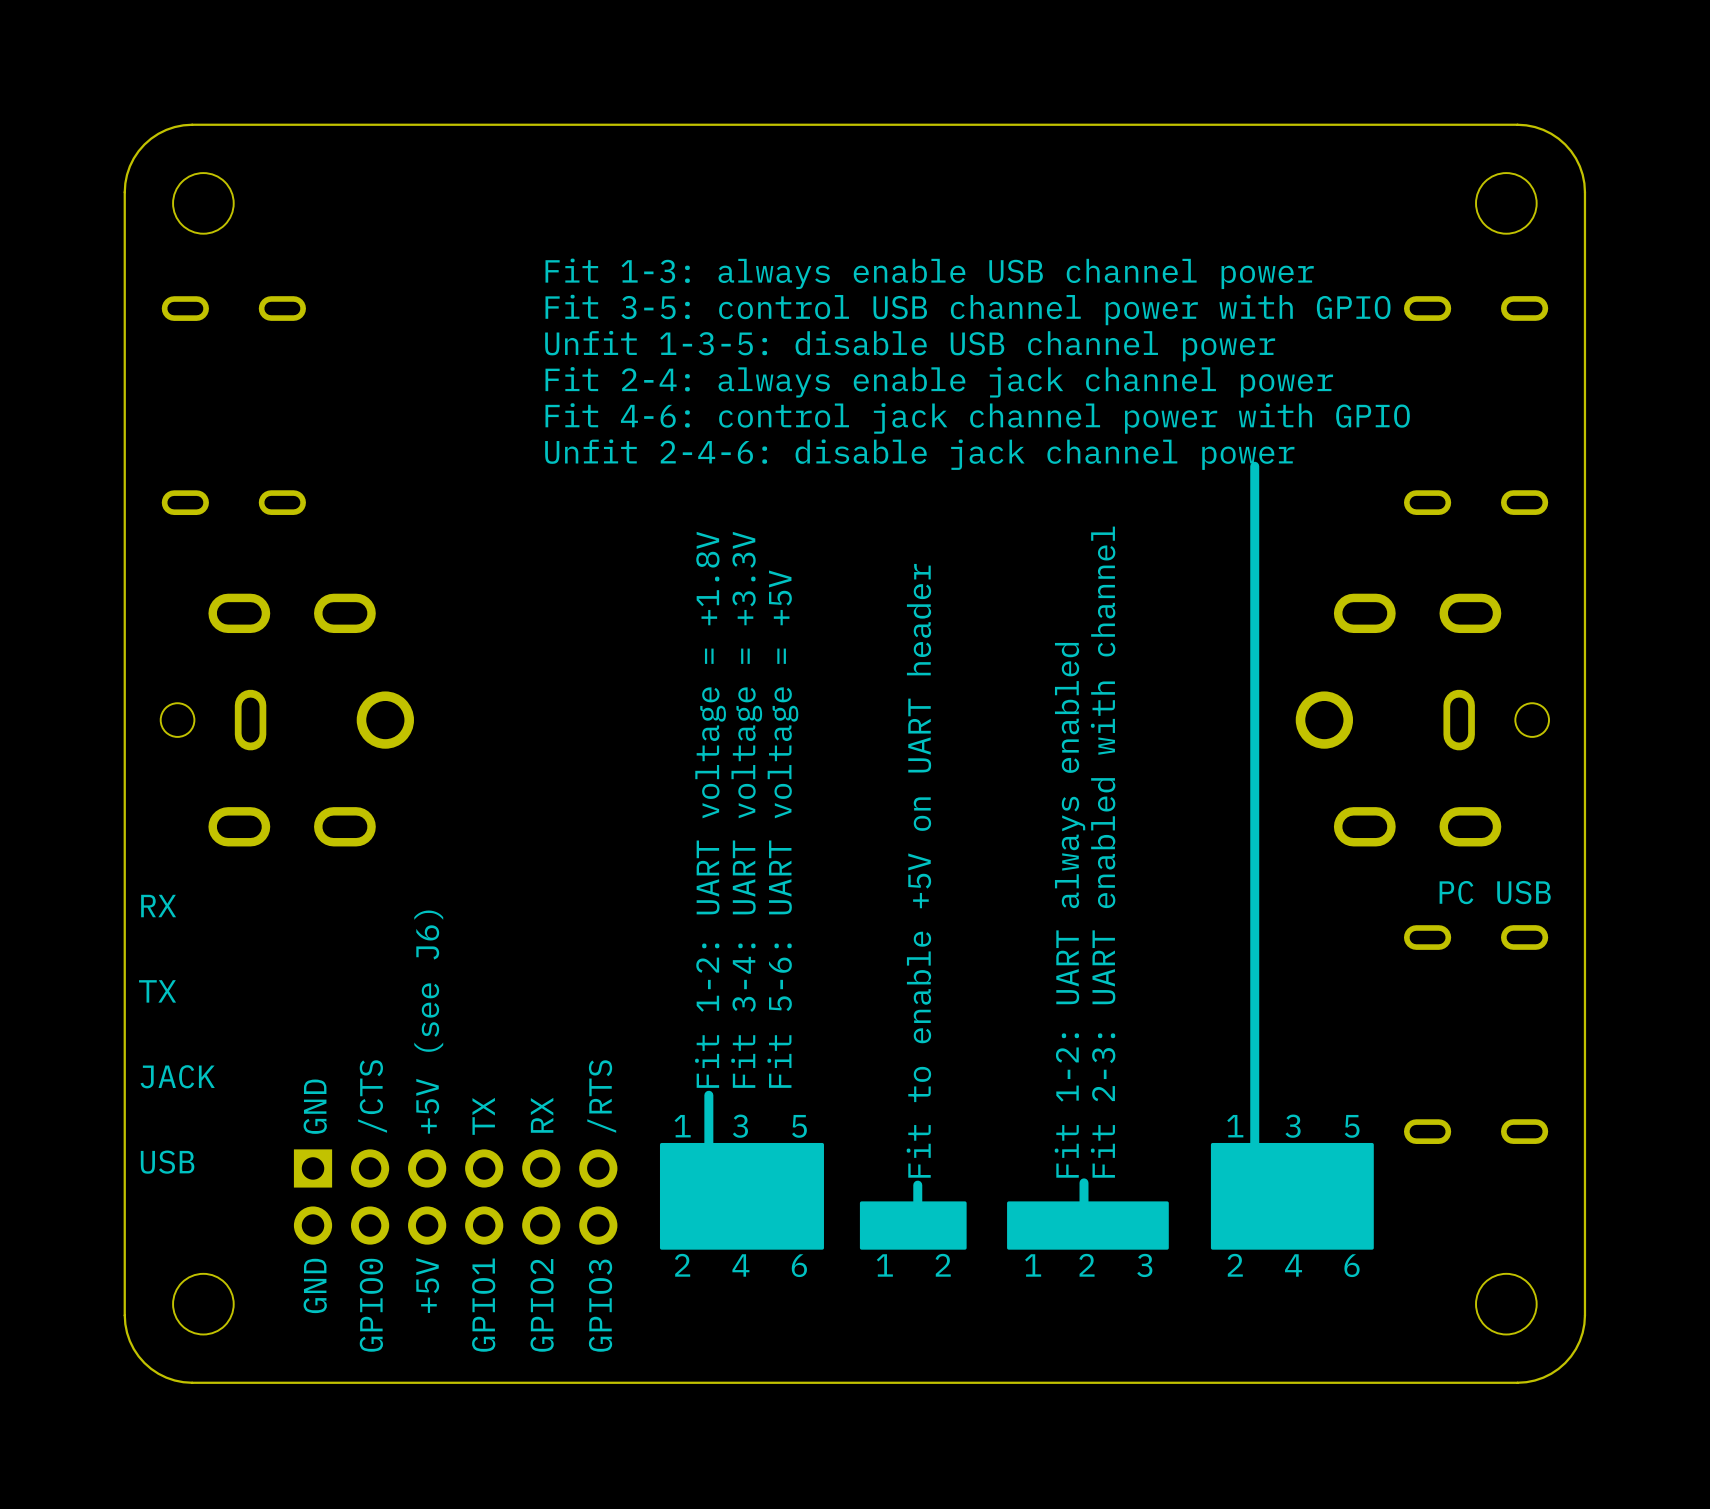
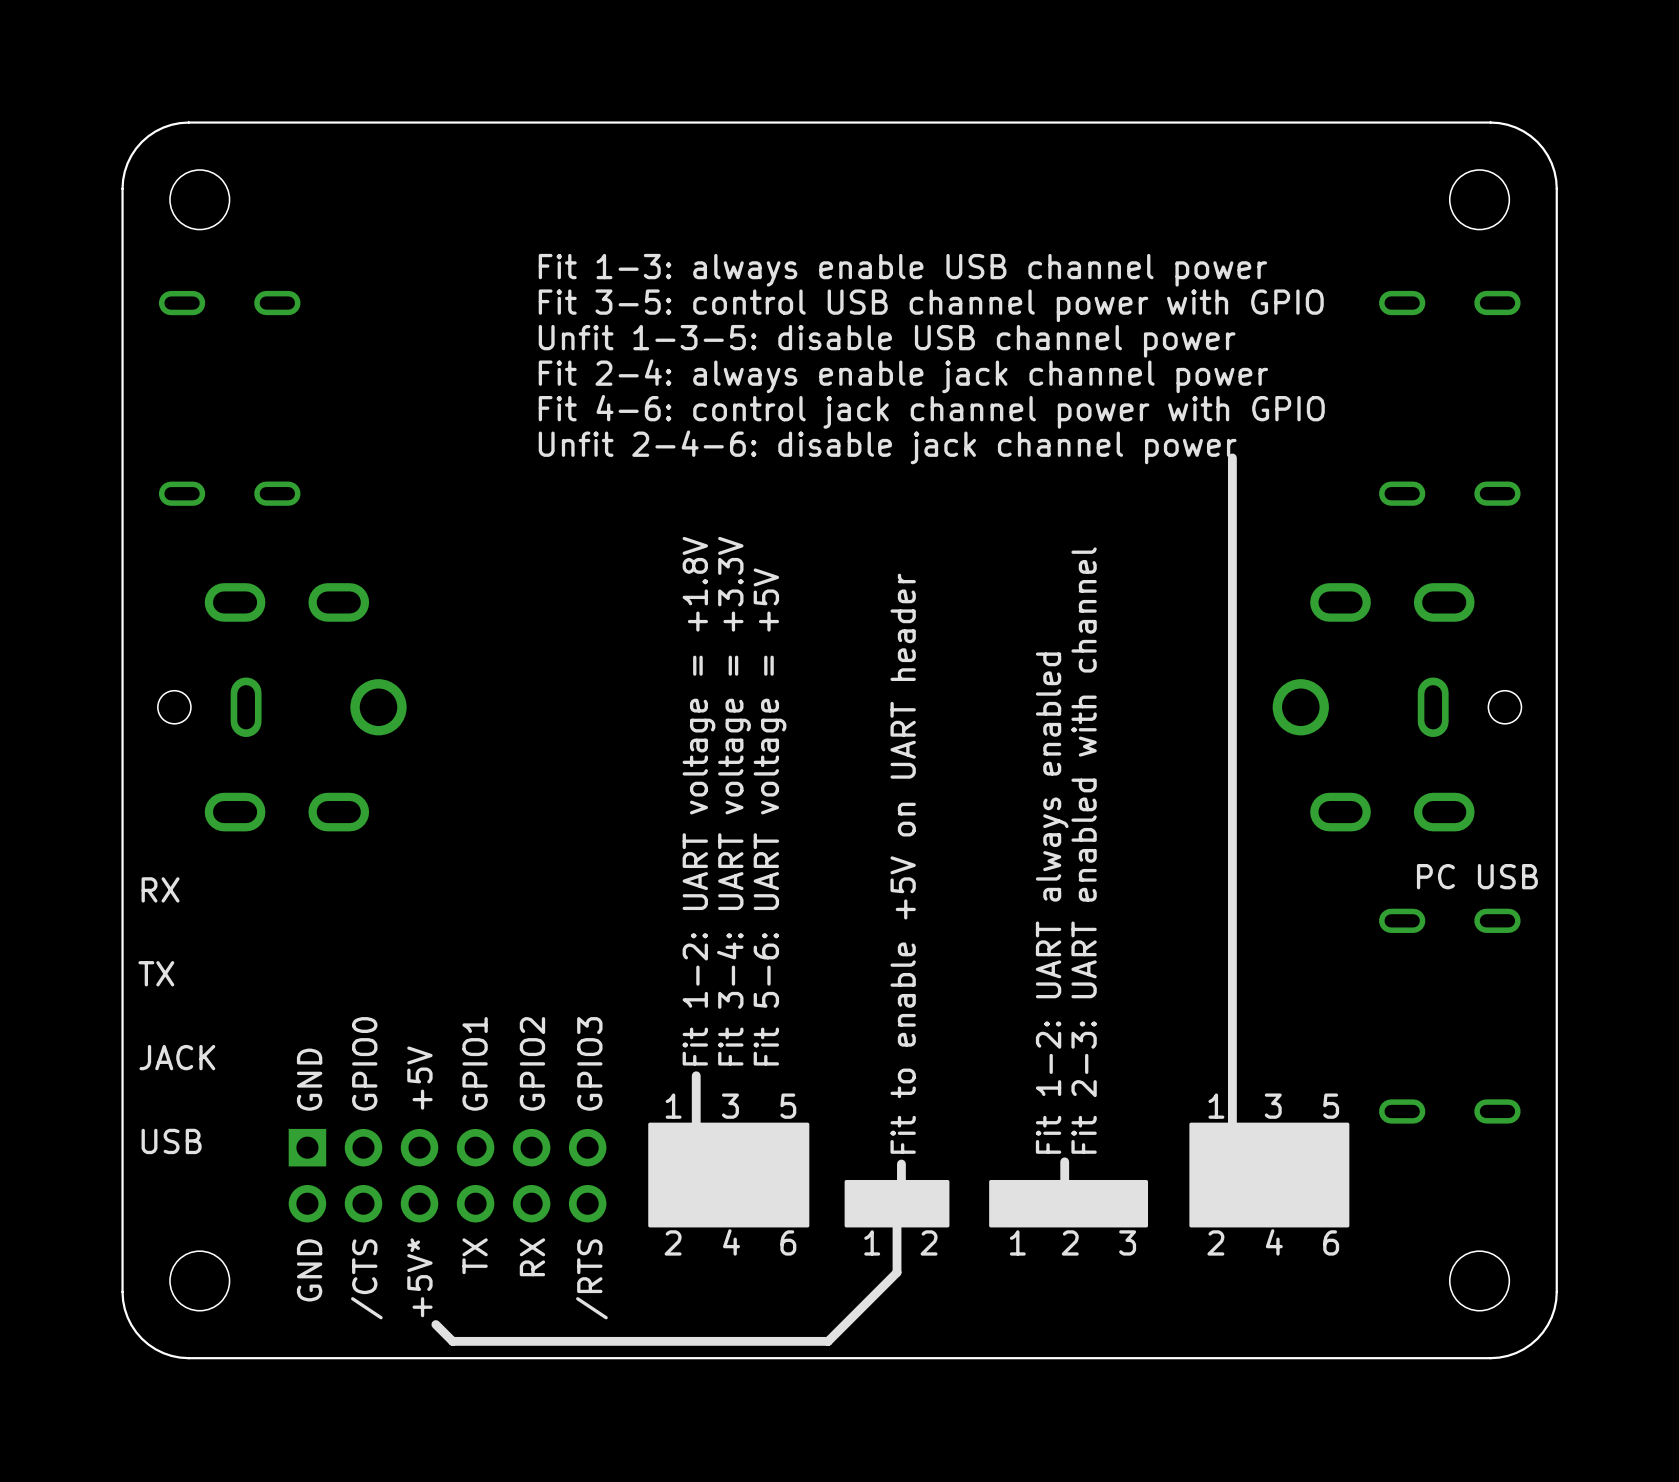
text: +5V (see J6) (428, 1022) -> +5V (419, 1078)
text: /CTS (372, 1096) -> GPIO0 (364, 1063)
text: /RTS (601, 1096) -> GPIO3 (589, 1063)
text: RX (542, 1115) -> GPIO2 (532, 1063)
text: TX (483, 1116) -> GPIO1 (475, 1063)
line: none -> (897, 1225) (897, 1272) (828, 1341) (452, 1341) (435, 1324)
text: +5V (427, 1285) -> +5V* (419, 1277)
text: GPIO0 (371, 1305) -> /CTS (366, 1279)
text: GPIO1 (483, 1305) -> TX (475, 1256)
text: GPIO2 (542, 1305) -> RX (532, 1257)
text: GPIO3 (600, 1305) -> /RTS (591, 1279)

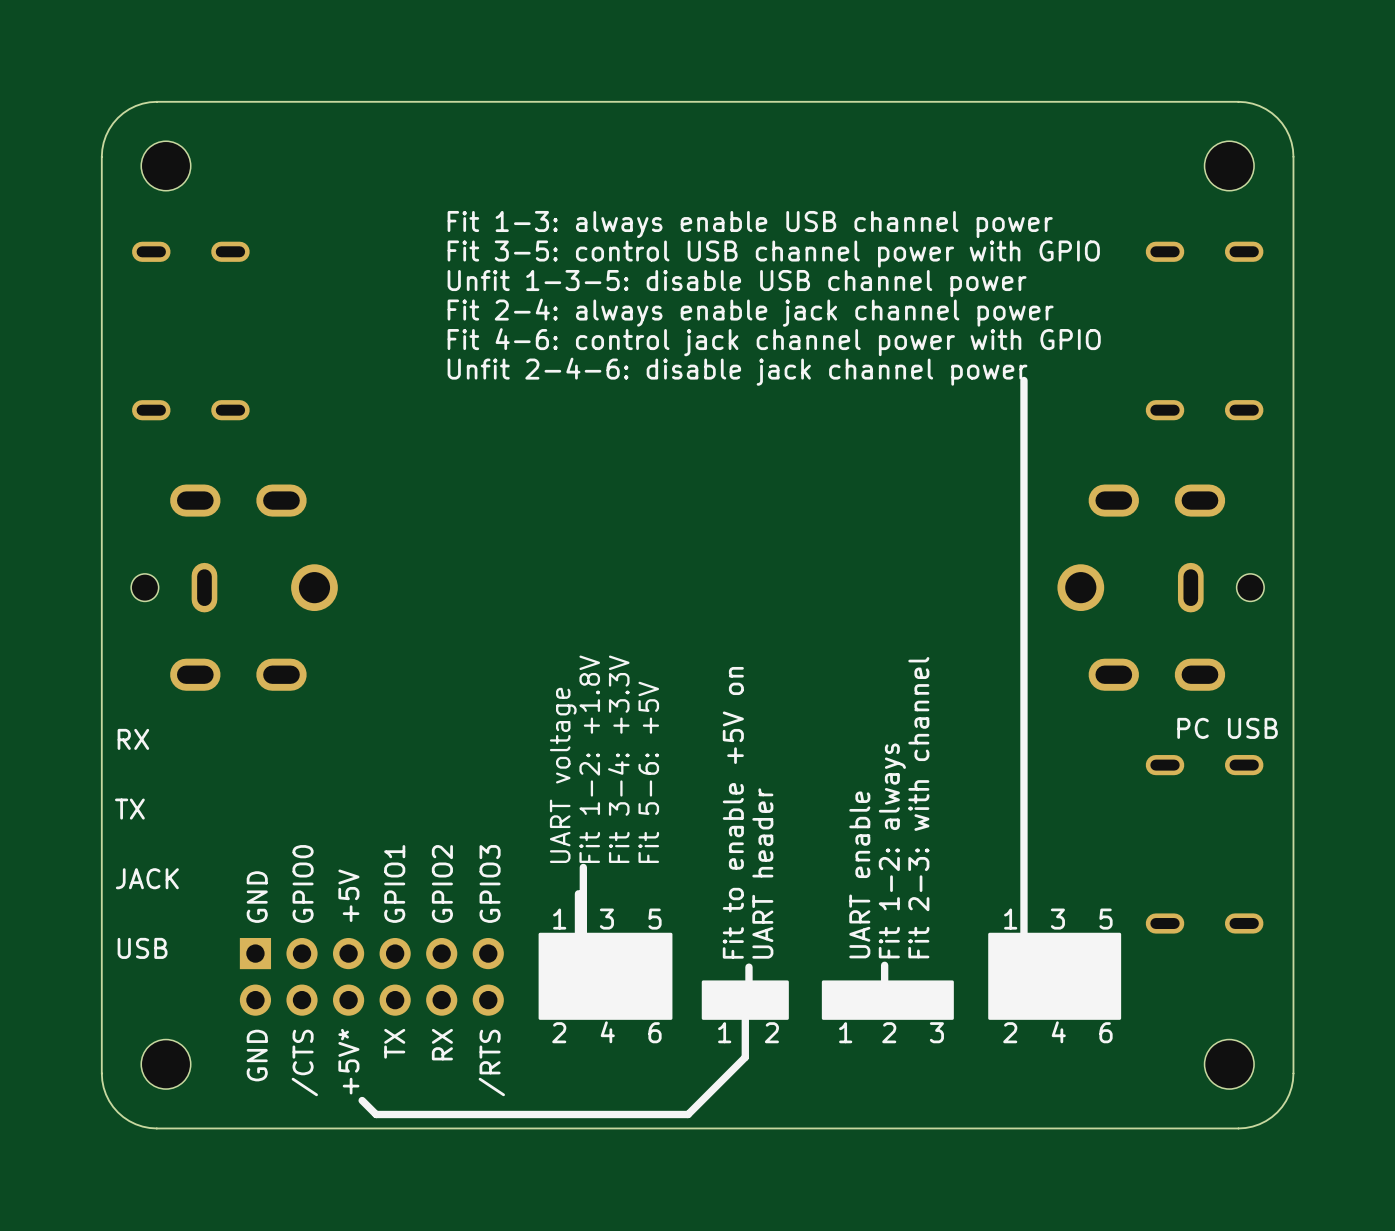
text: Fit 1-2: UART voltage = +1.8V (698, 801) -> Fit 1-2: +1.8V (589, 759)
text: Fit 3-4: UART voltage = +3.3V (733, 801) -> Fit 3-4: +3.3V (618, 759)
text: Fit 5-6: UART voltage = +5V (770, 816) -> Fit 5-6: +5V (648, 772)
text: Fit 2-3: UART enabled with channel (1084, 850) -> Fit 2-3: with channel (918, 807)
text: Fit to enable +5V on UART header (903, 863) -> Fit to enable +5V on (733, 812)
text: Fit 1-2: UART always enabled (1052, 903) -> Fit 1-2: always (892, 850)
text: none -> UART voltage (563, 775)
line: none -> (583, 867) (583, 937)
text: none -> UART header (762, 873)
text: none -> UART enable (859, 874)

